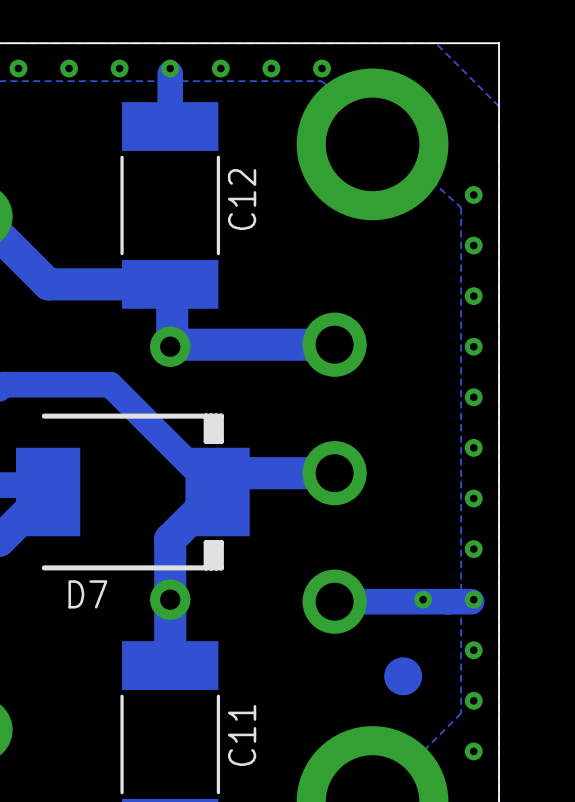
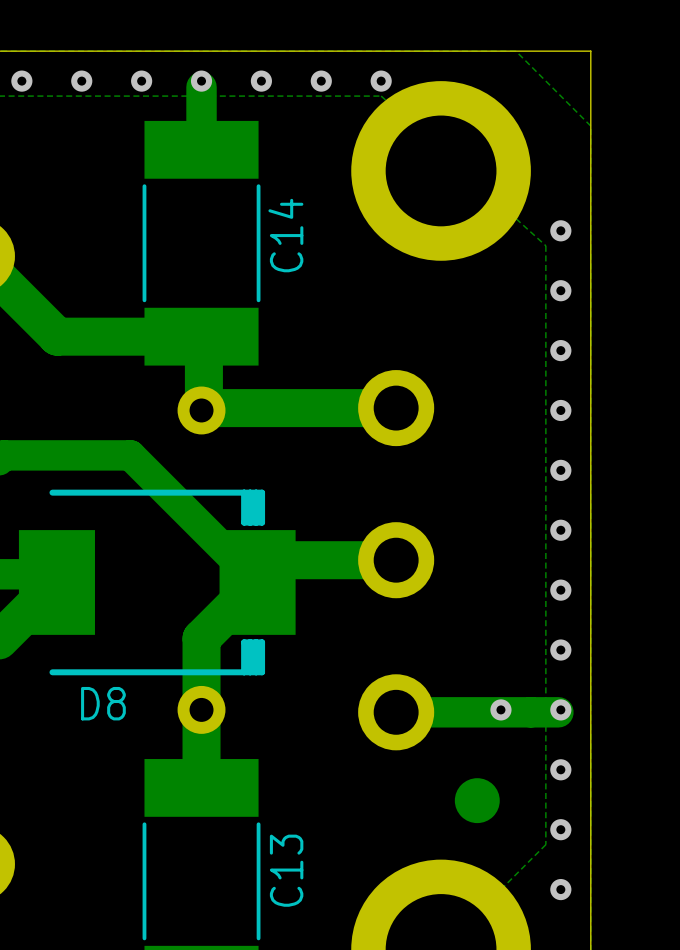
C12 name: C12 (242, 199) -> C14 (285, 235)
D7 name: D7 (87, 594) -> D8 (103, 703)
C11 name: C11 (242, 735) -> C13 (286, 870)

